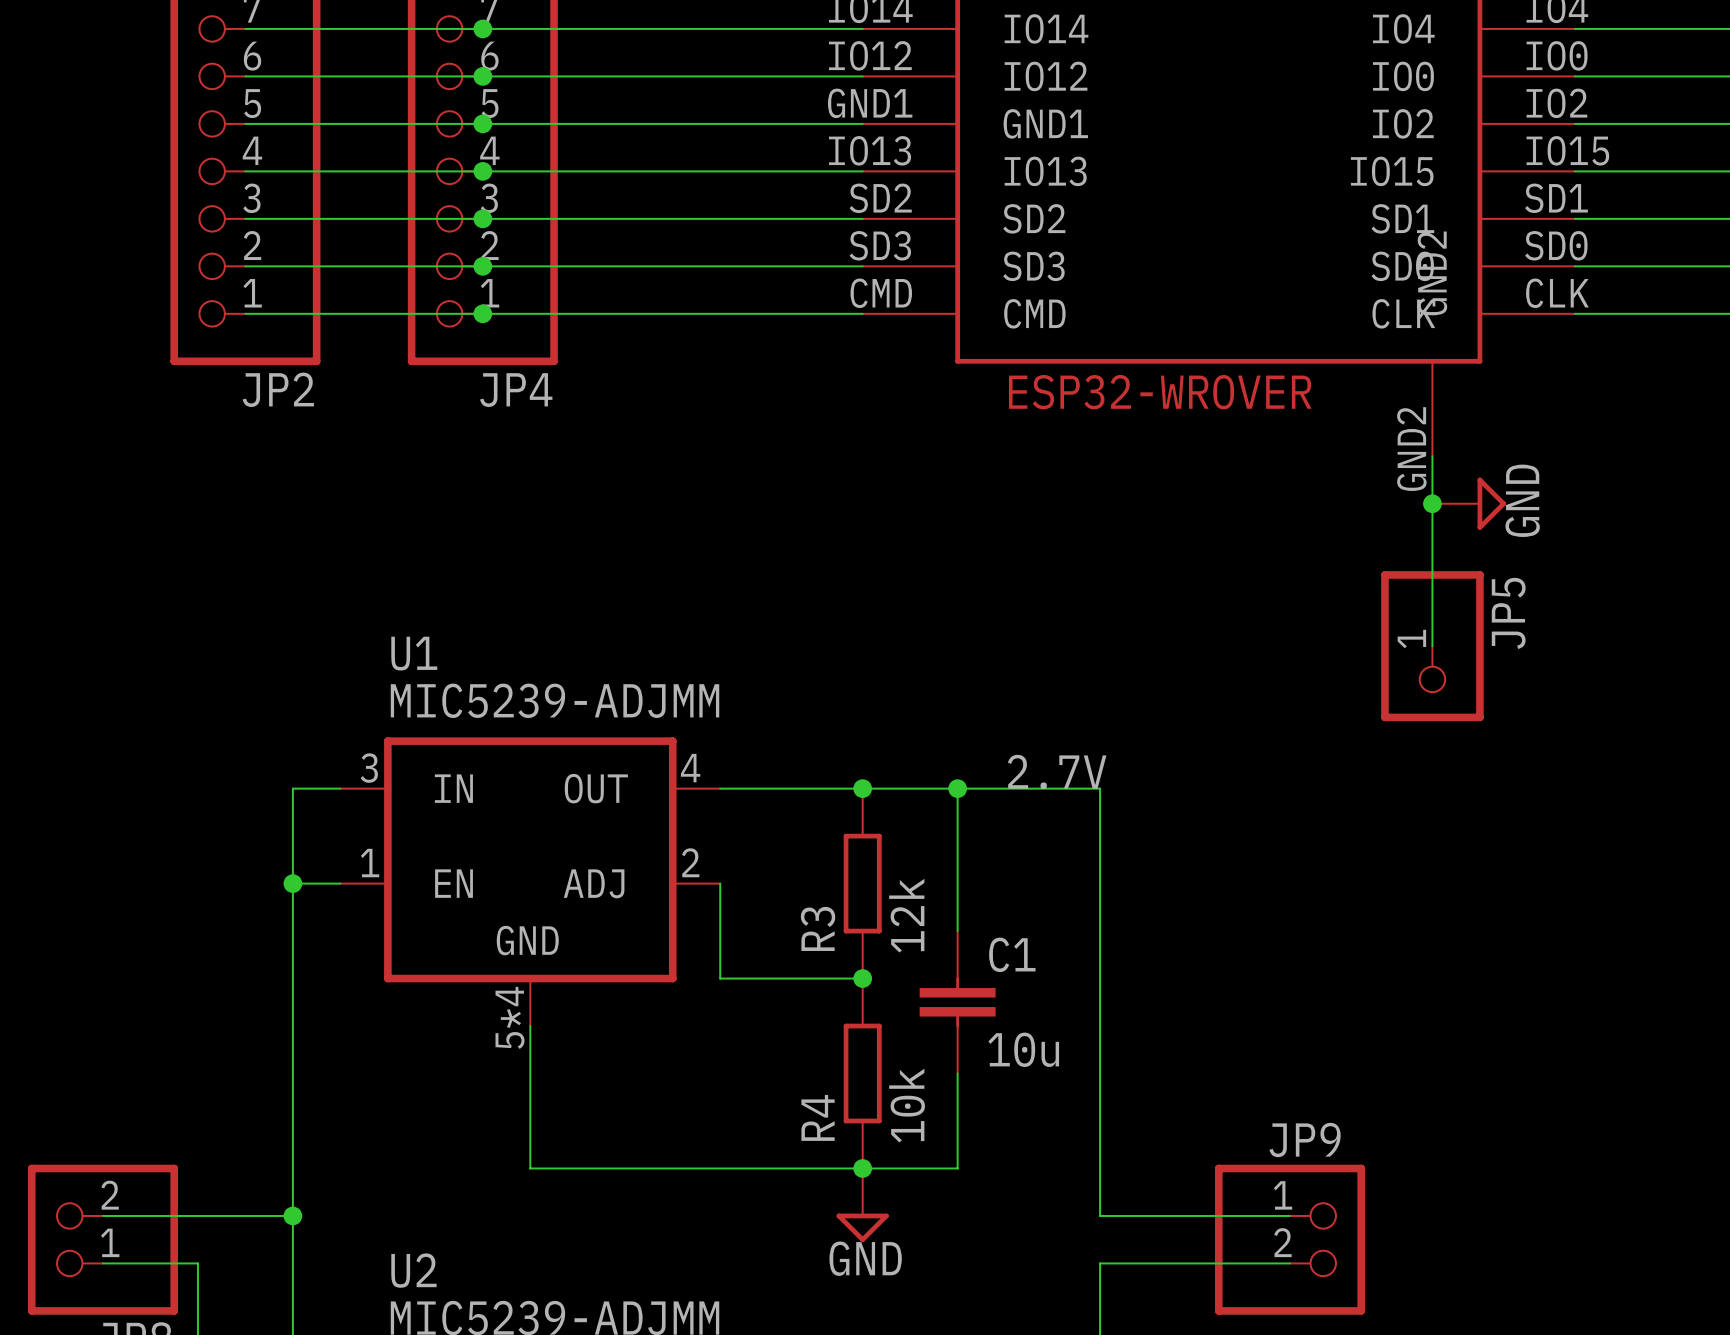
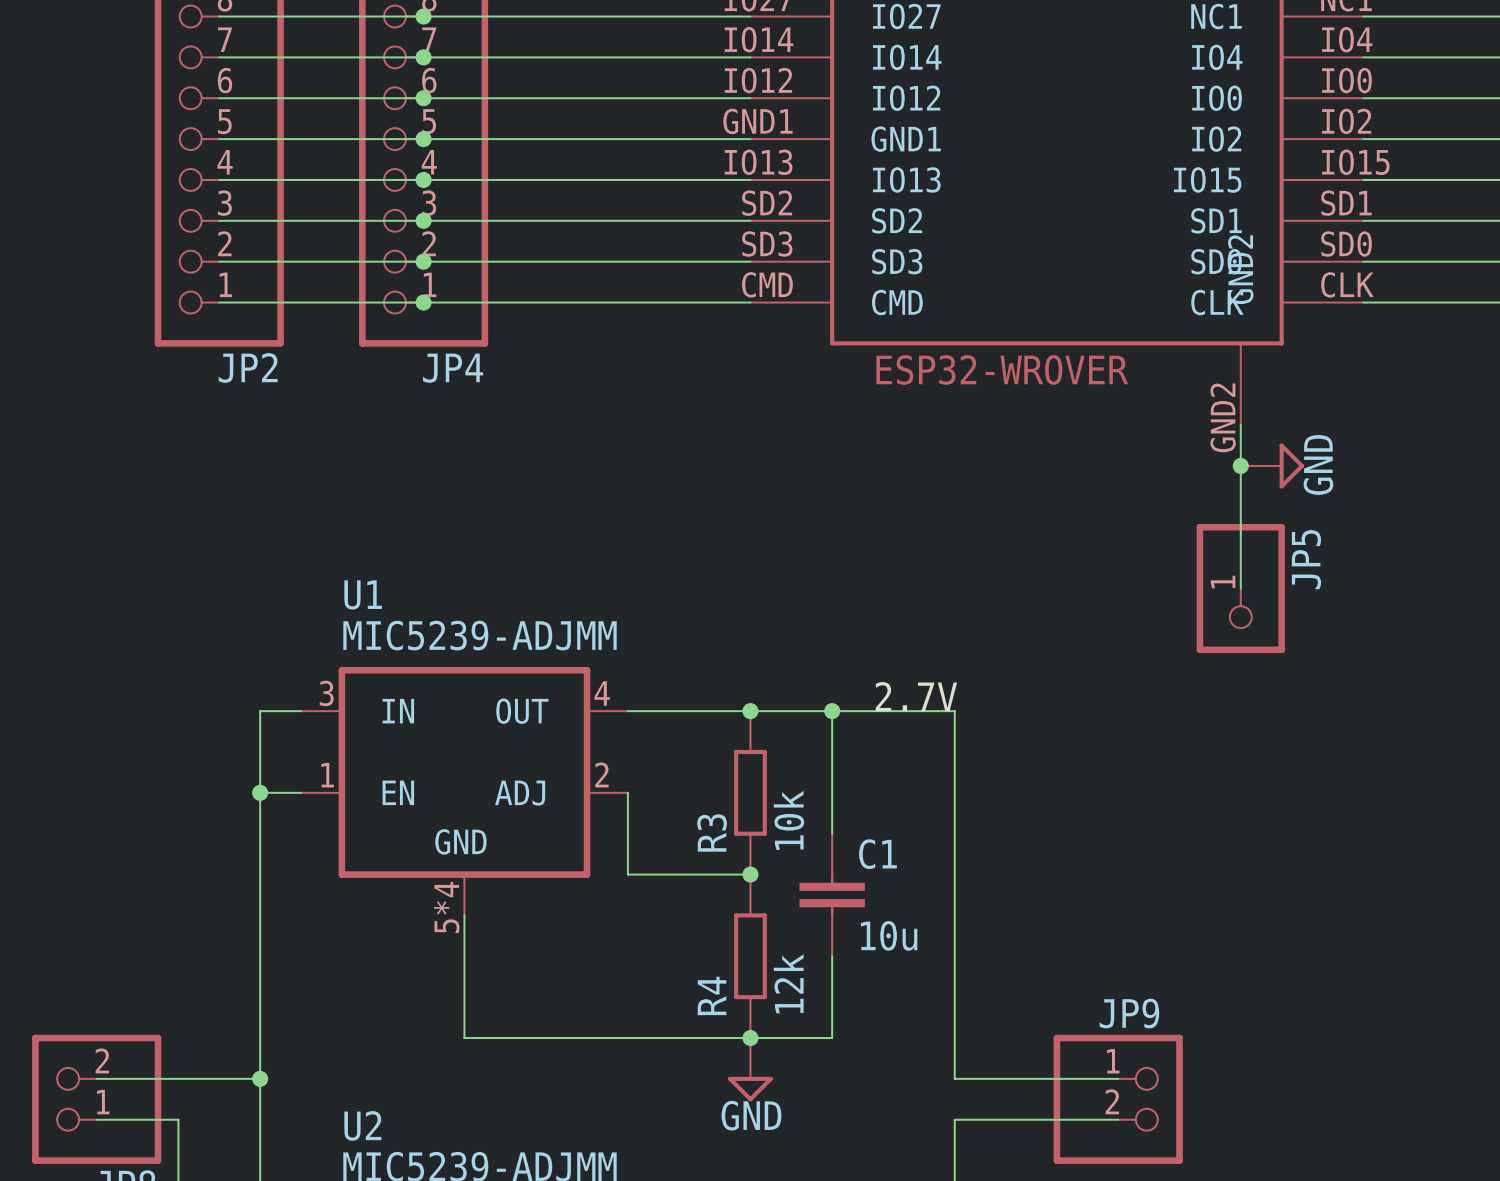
R3 value: 12k (906, 915) -> 10k (788, 820)
R4 value: 10k (907, 1105) -> 12k (788, 983)

